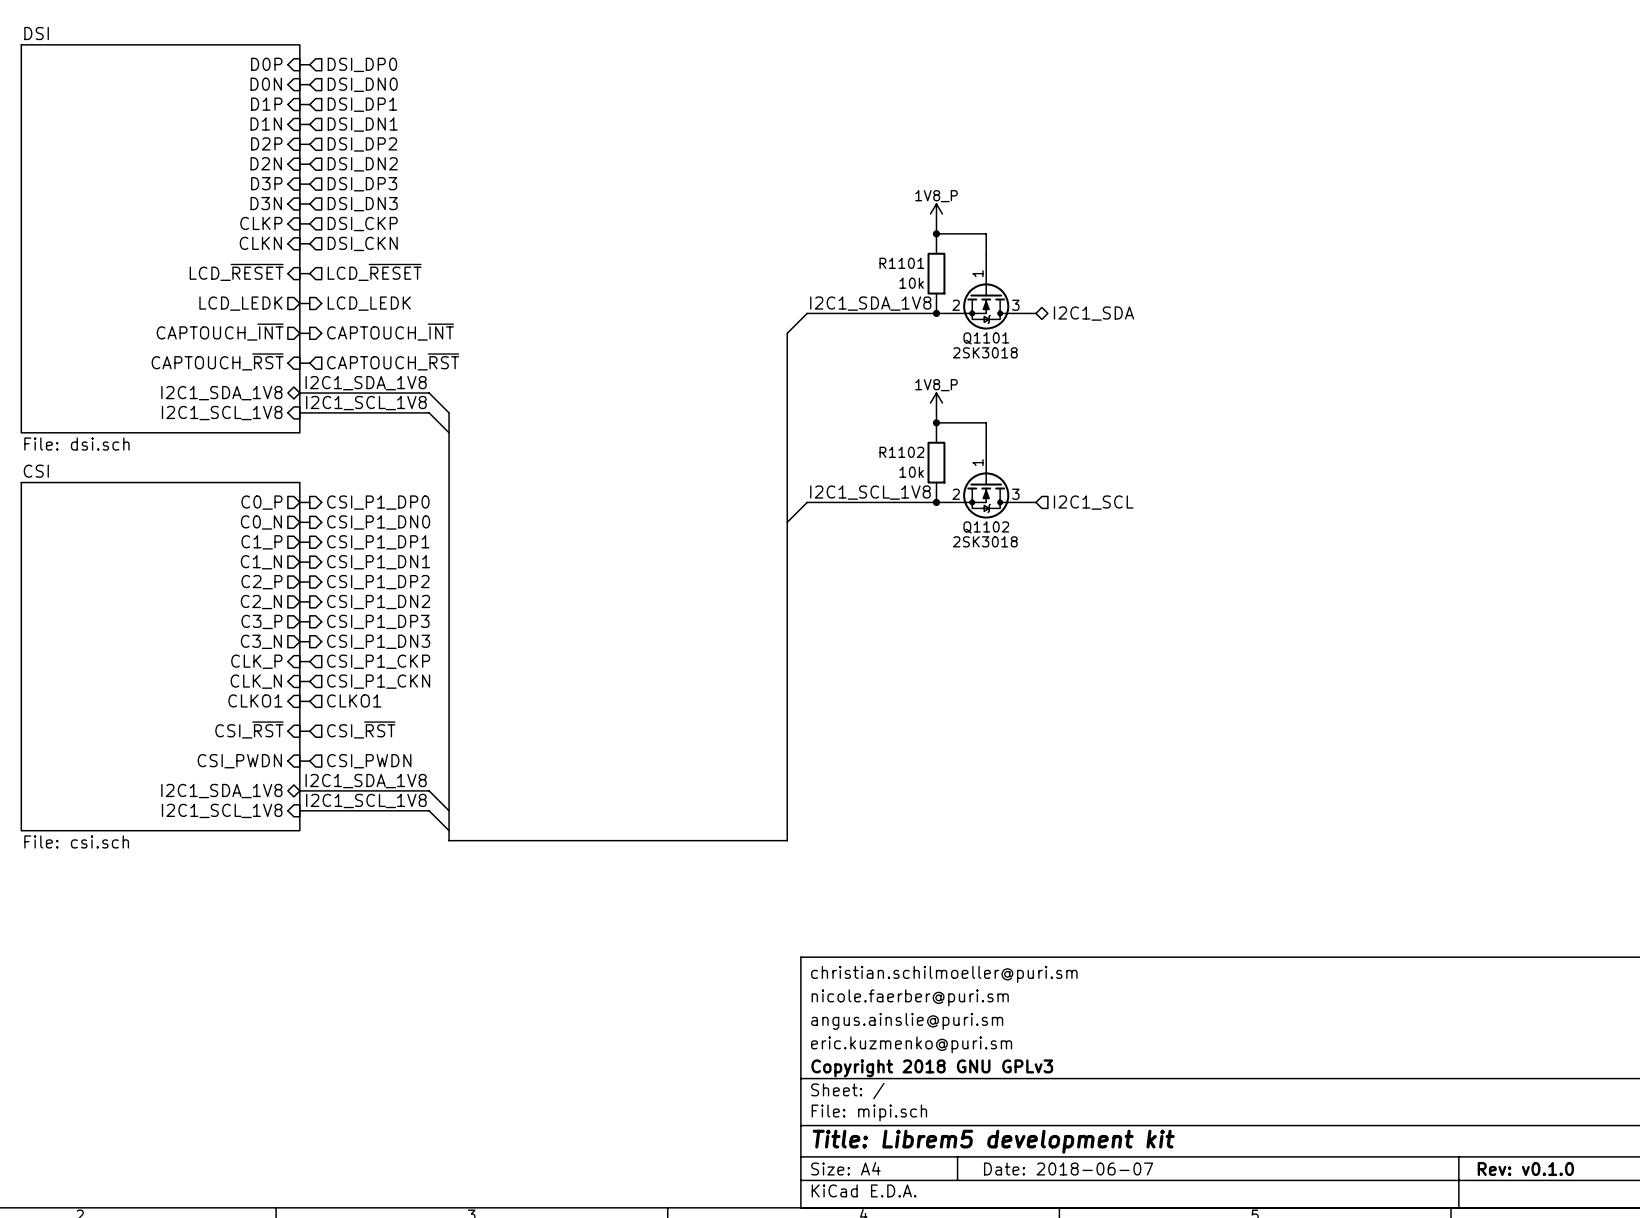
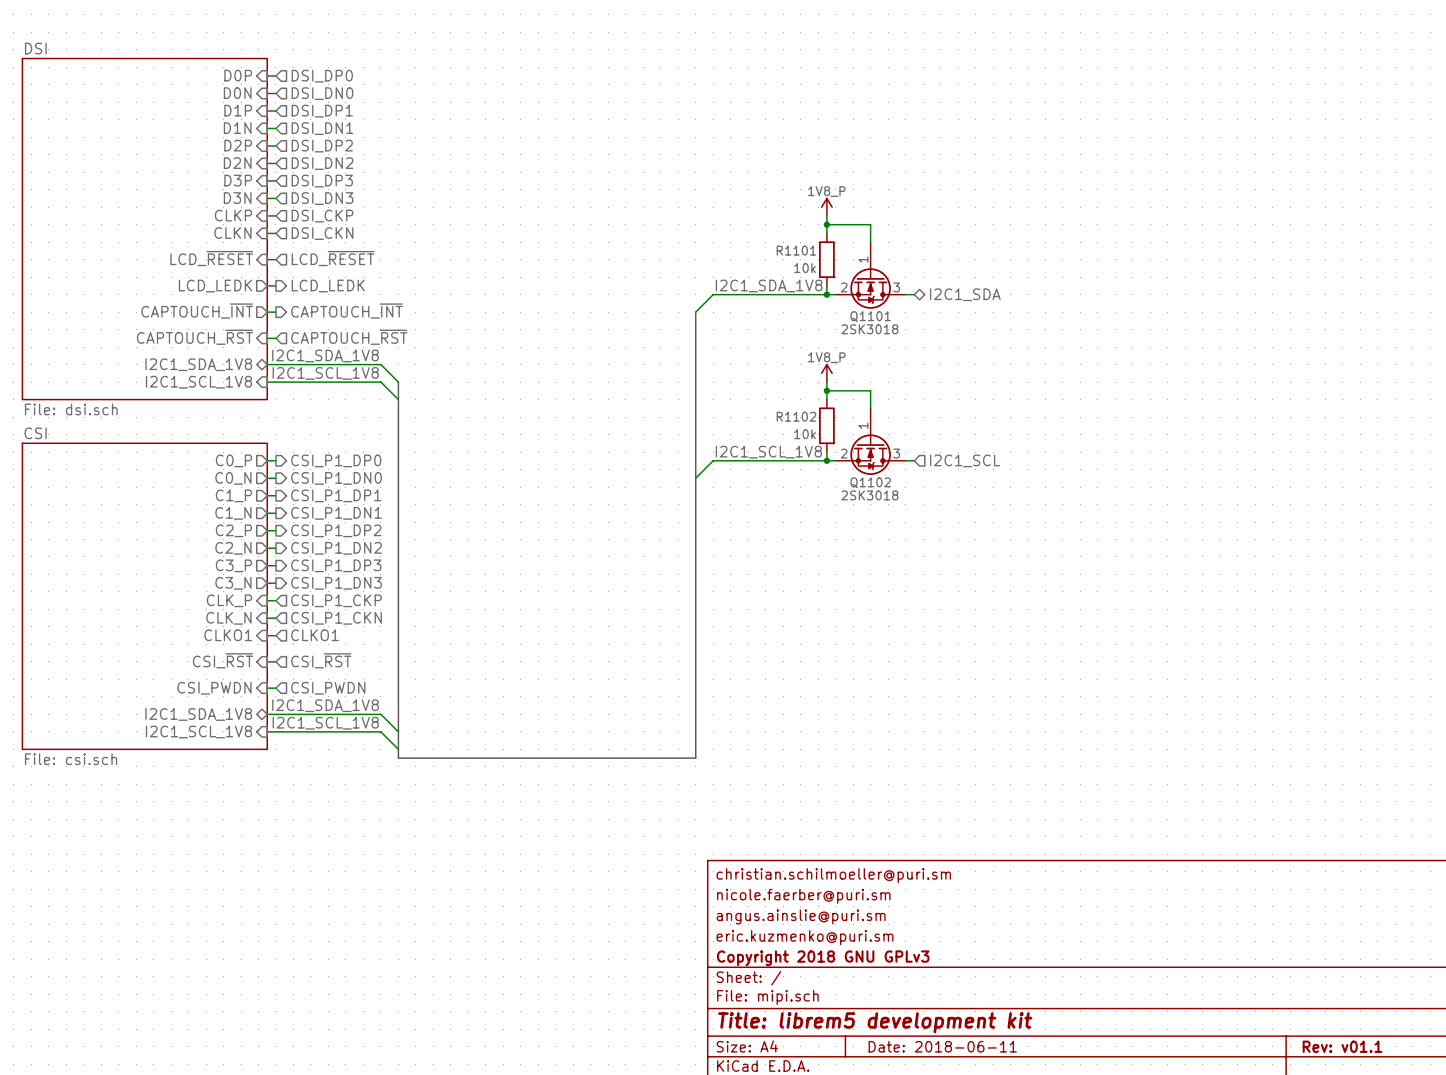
title block: Title: Librem5 development kit (993, 1141) -> Title: librem5 development kit (875, 1022)
title block: Date: 2018-06-07 (1068, 1169) -> Date: 2018-06-11 (942, 1046)
title block: Rev: v0.1.0 (1525, 1169) -> Rev: v01.1 (1342, 1046)

